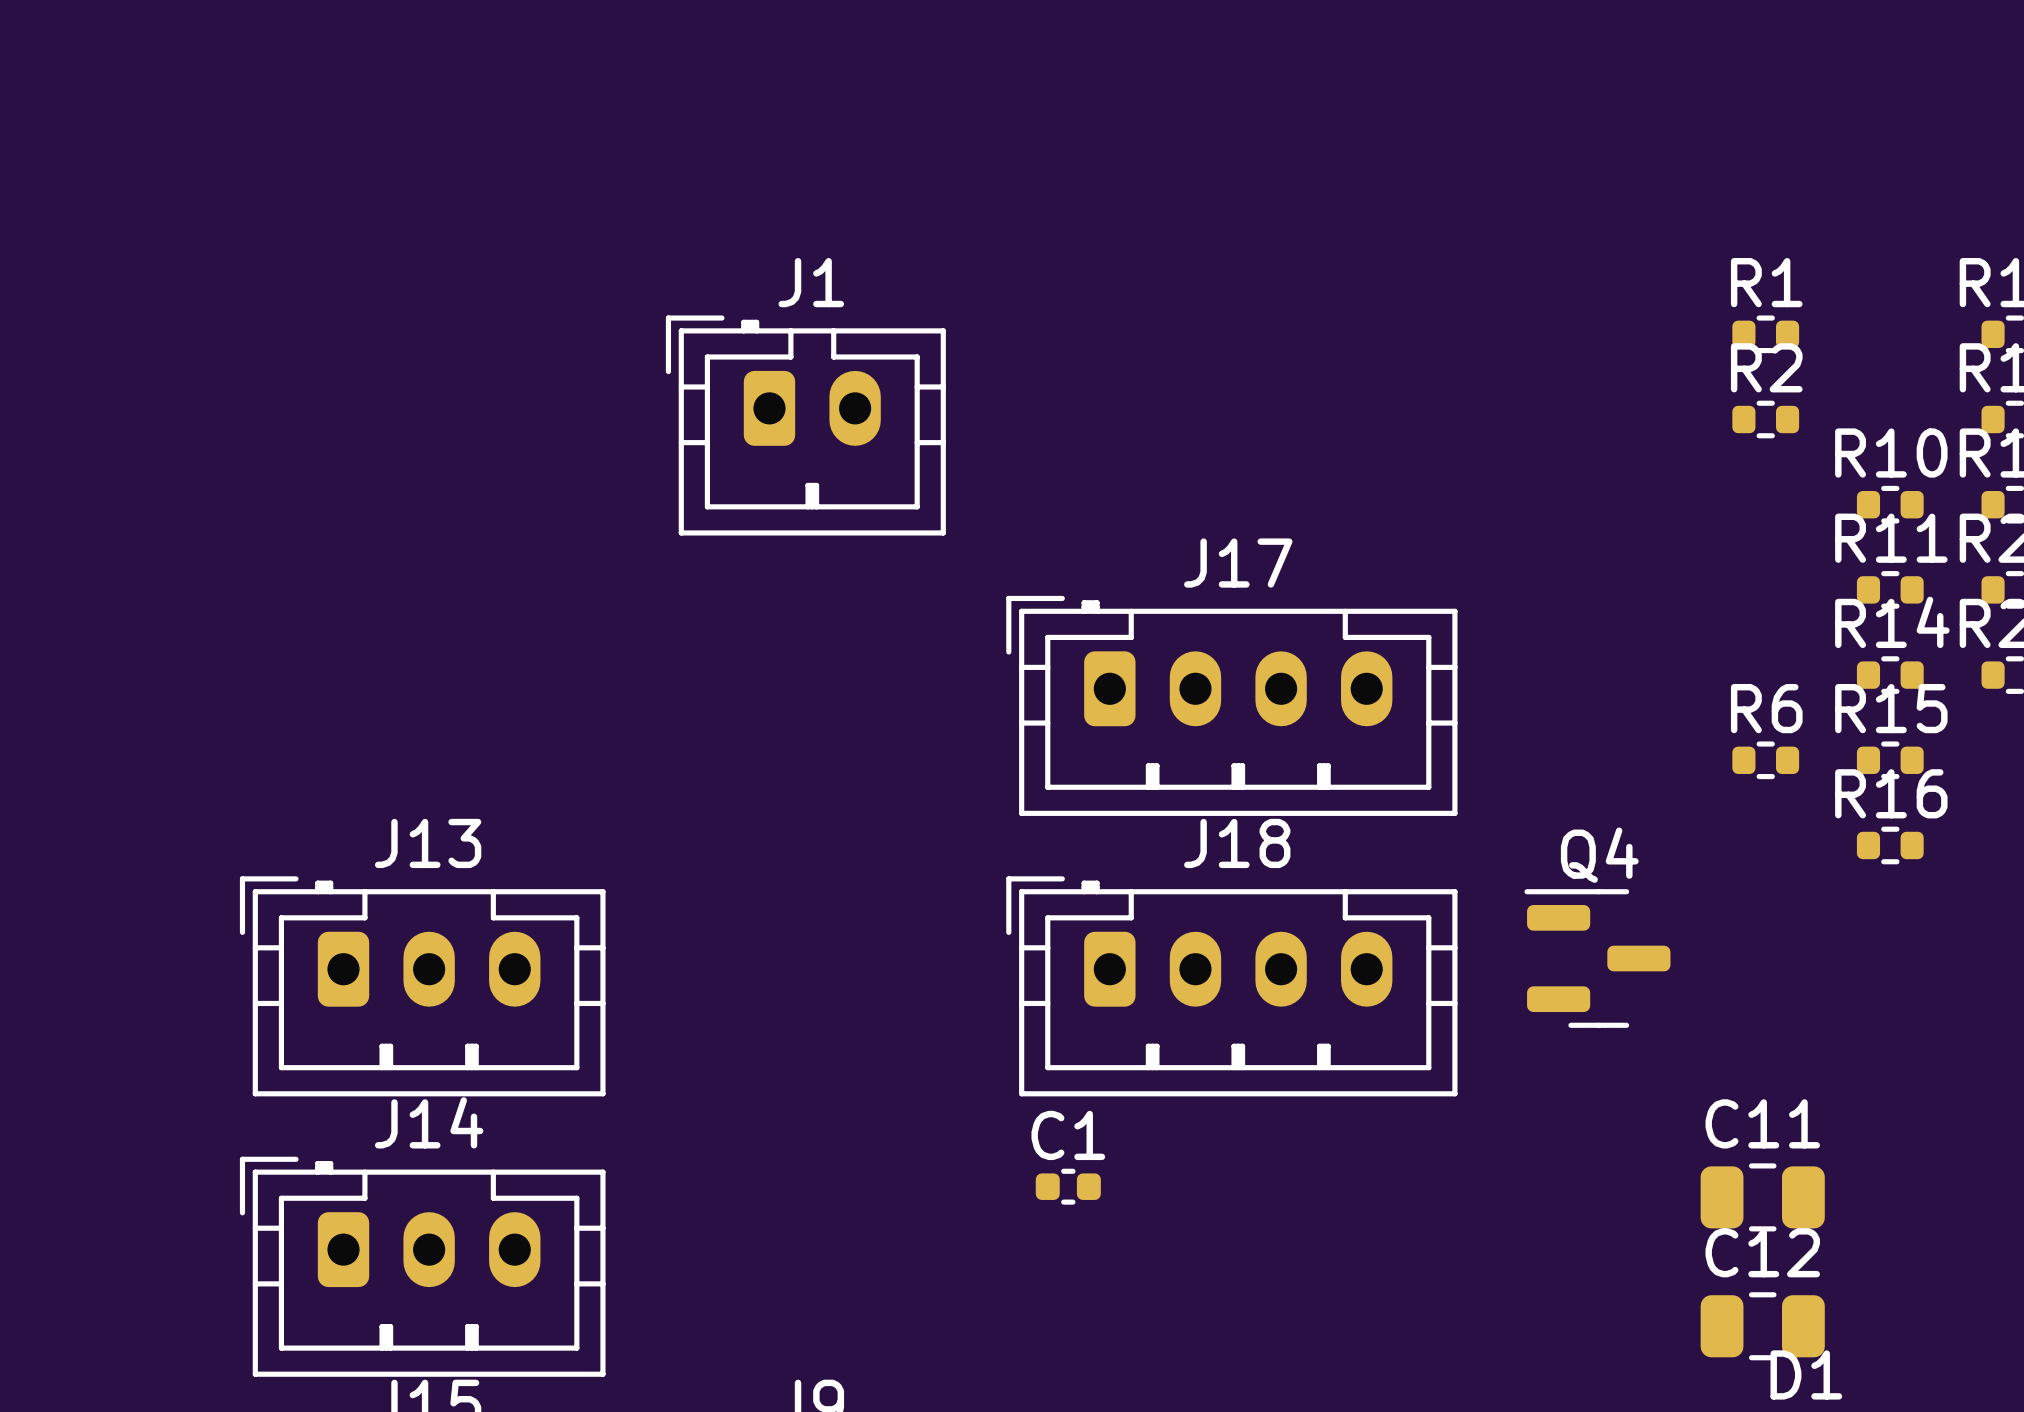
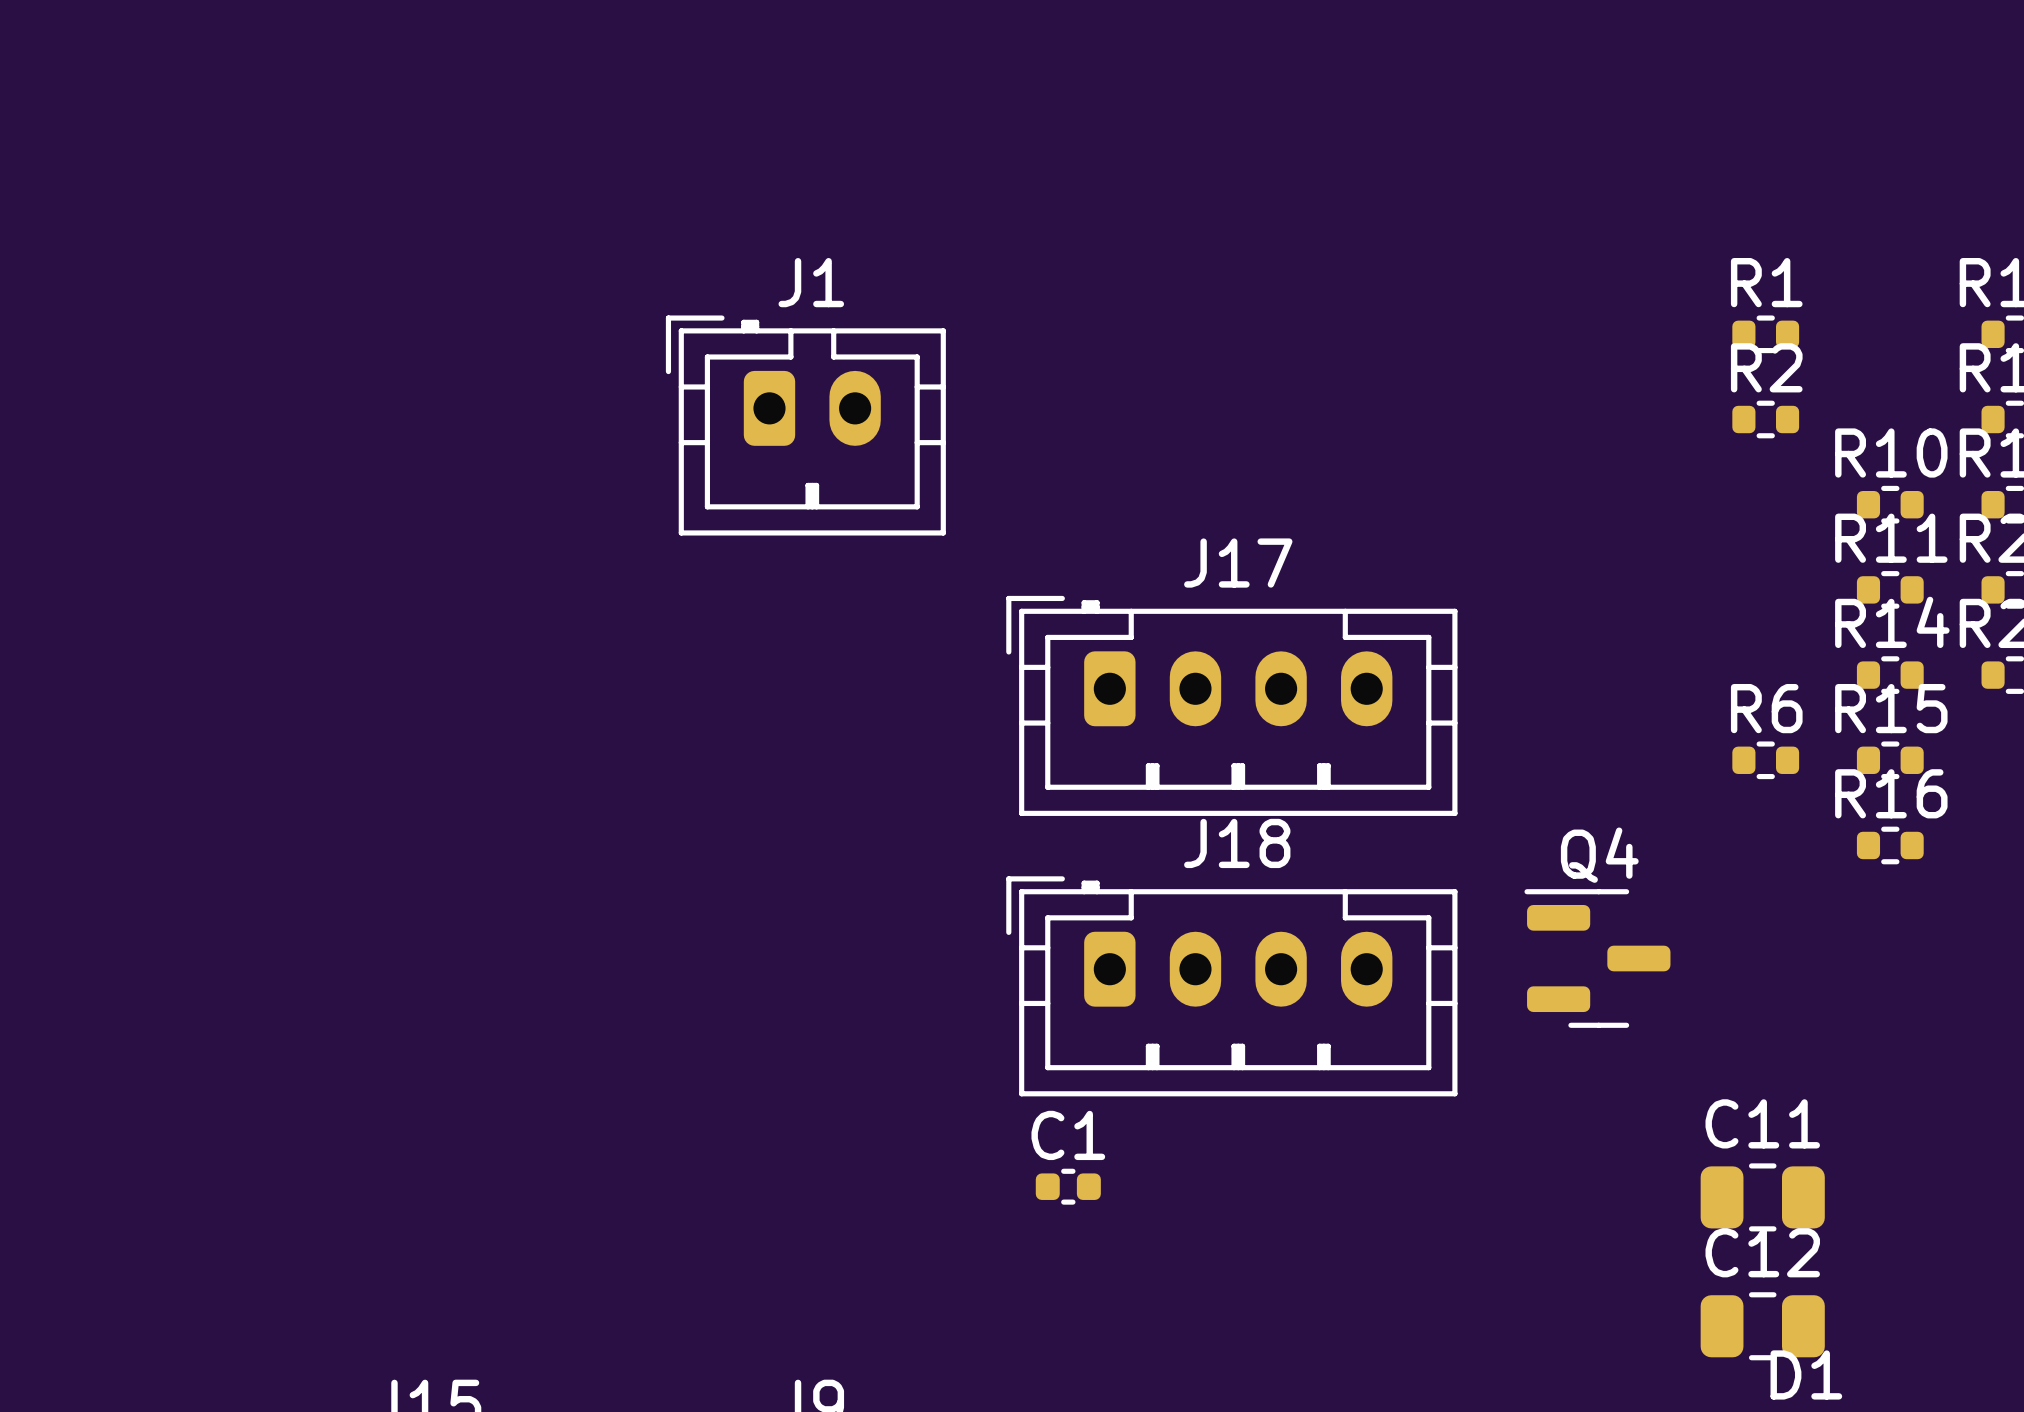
J13: (422, 986) -> none
J14: (422, 1266) -> none

